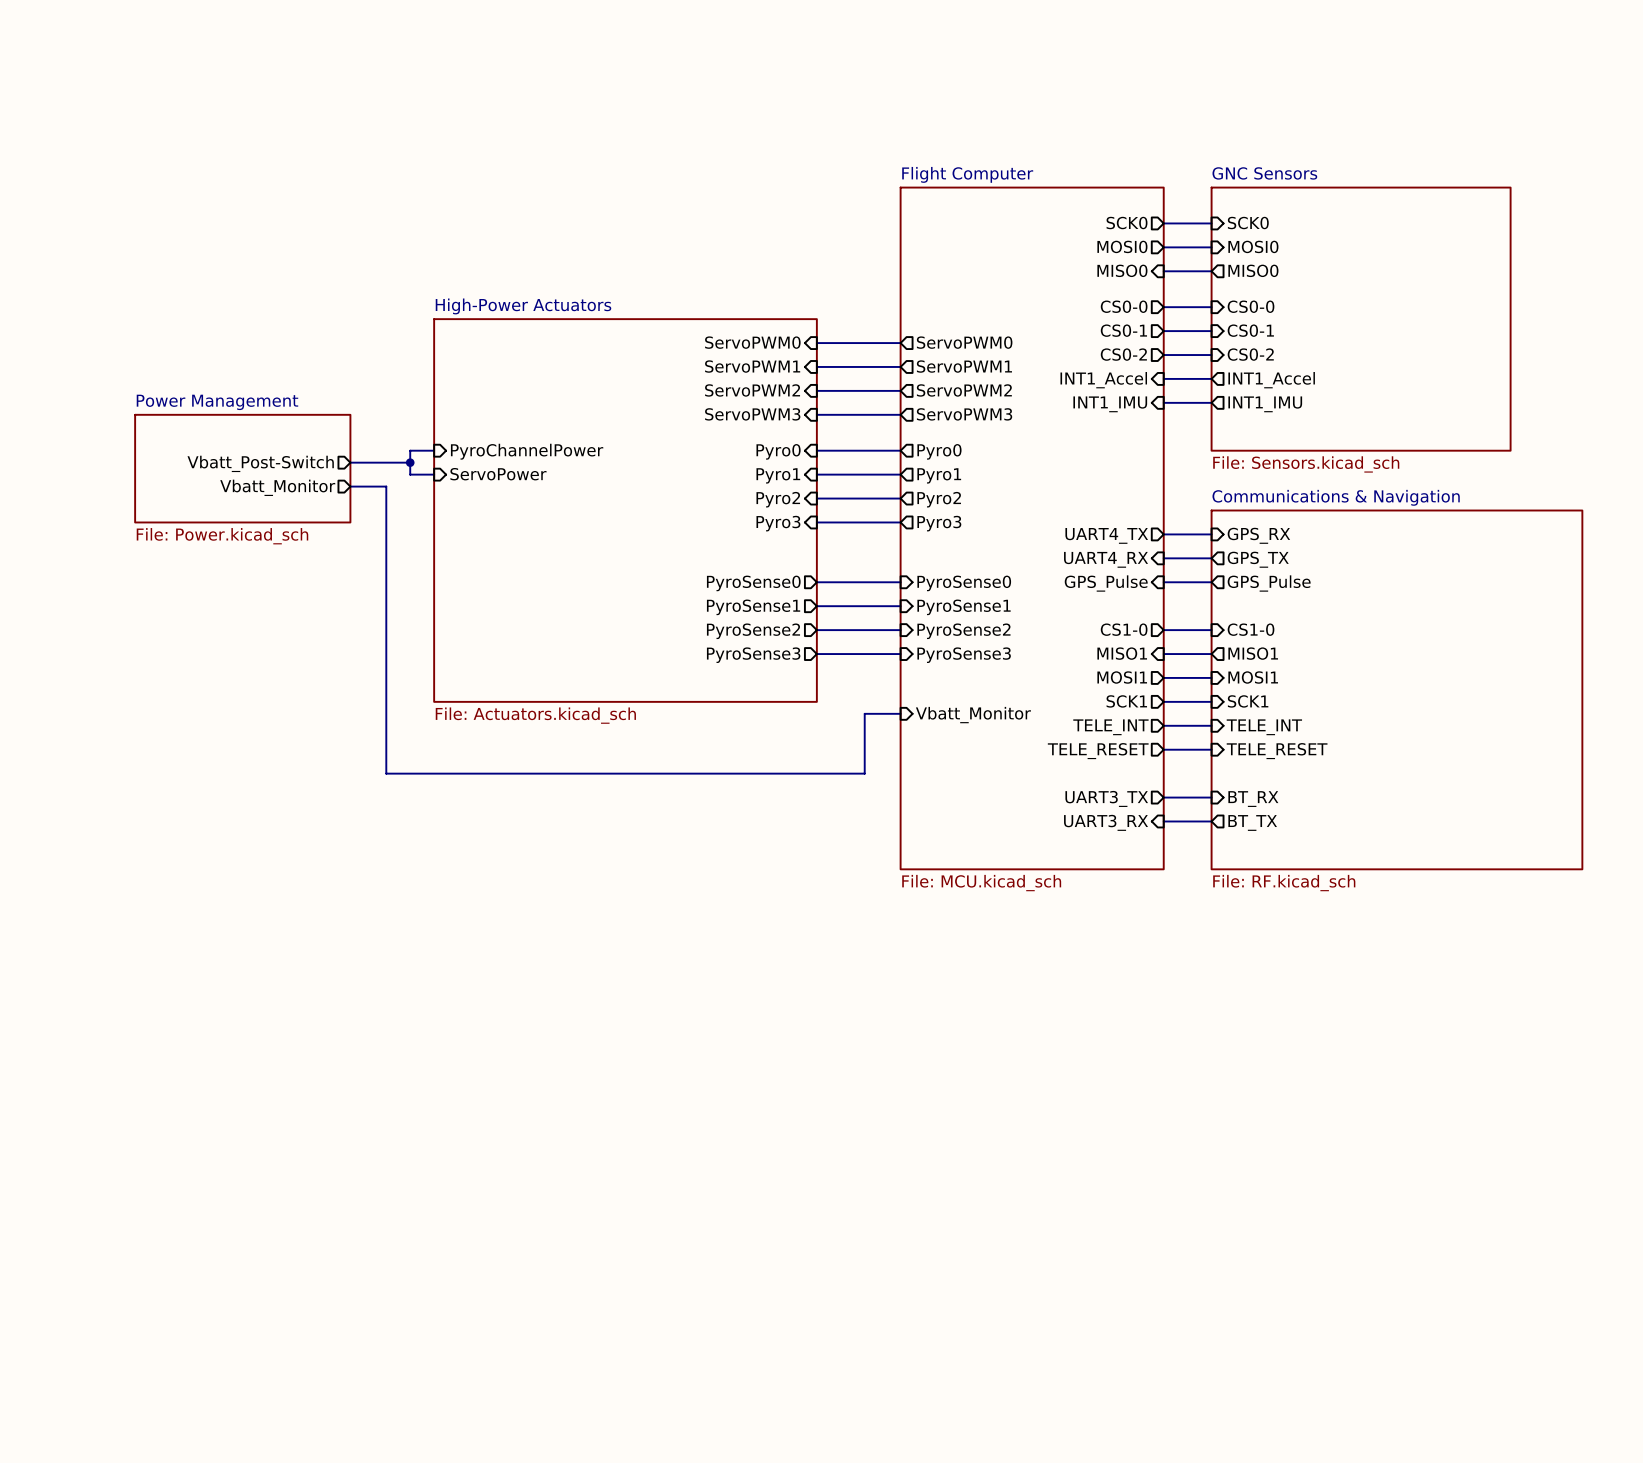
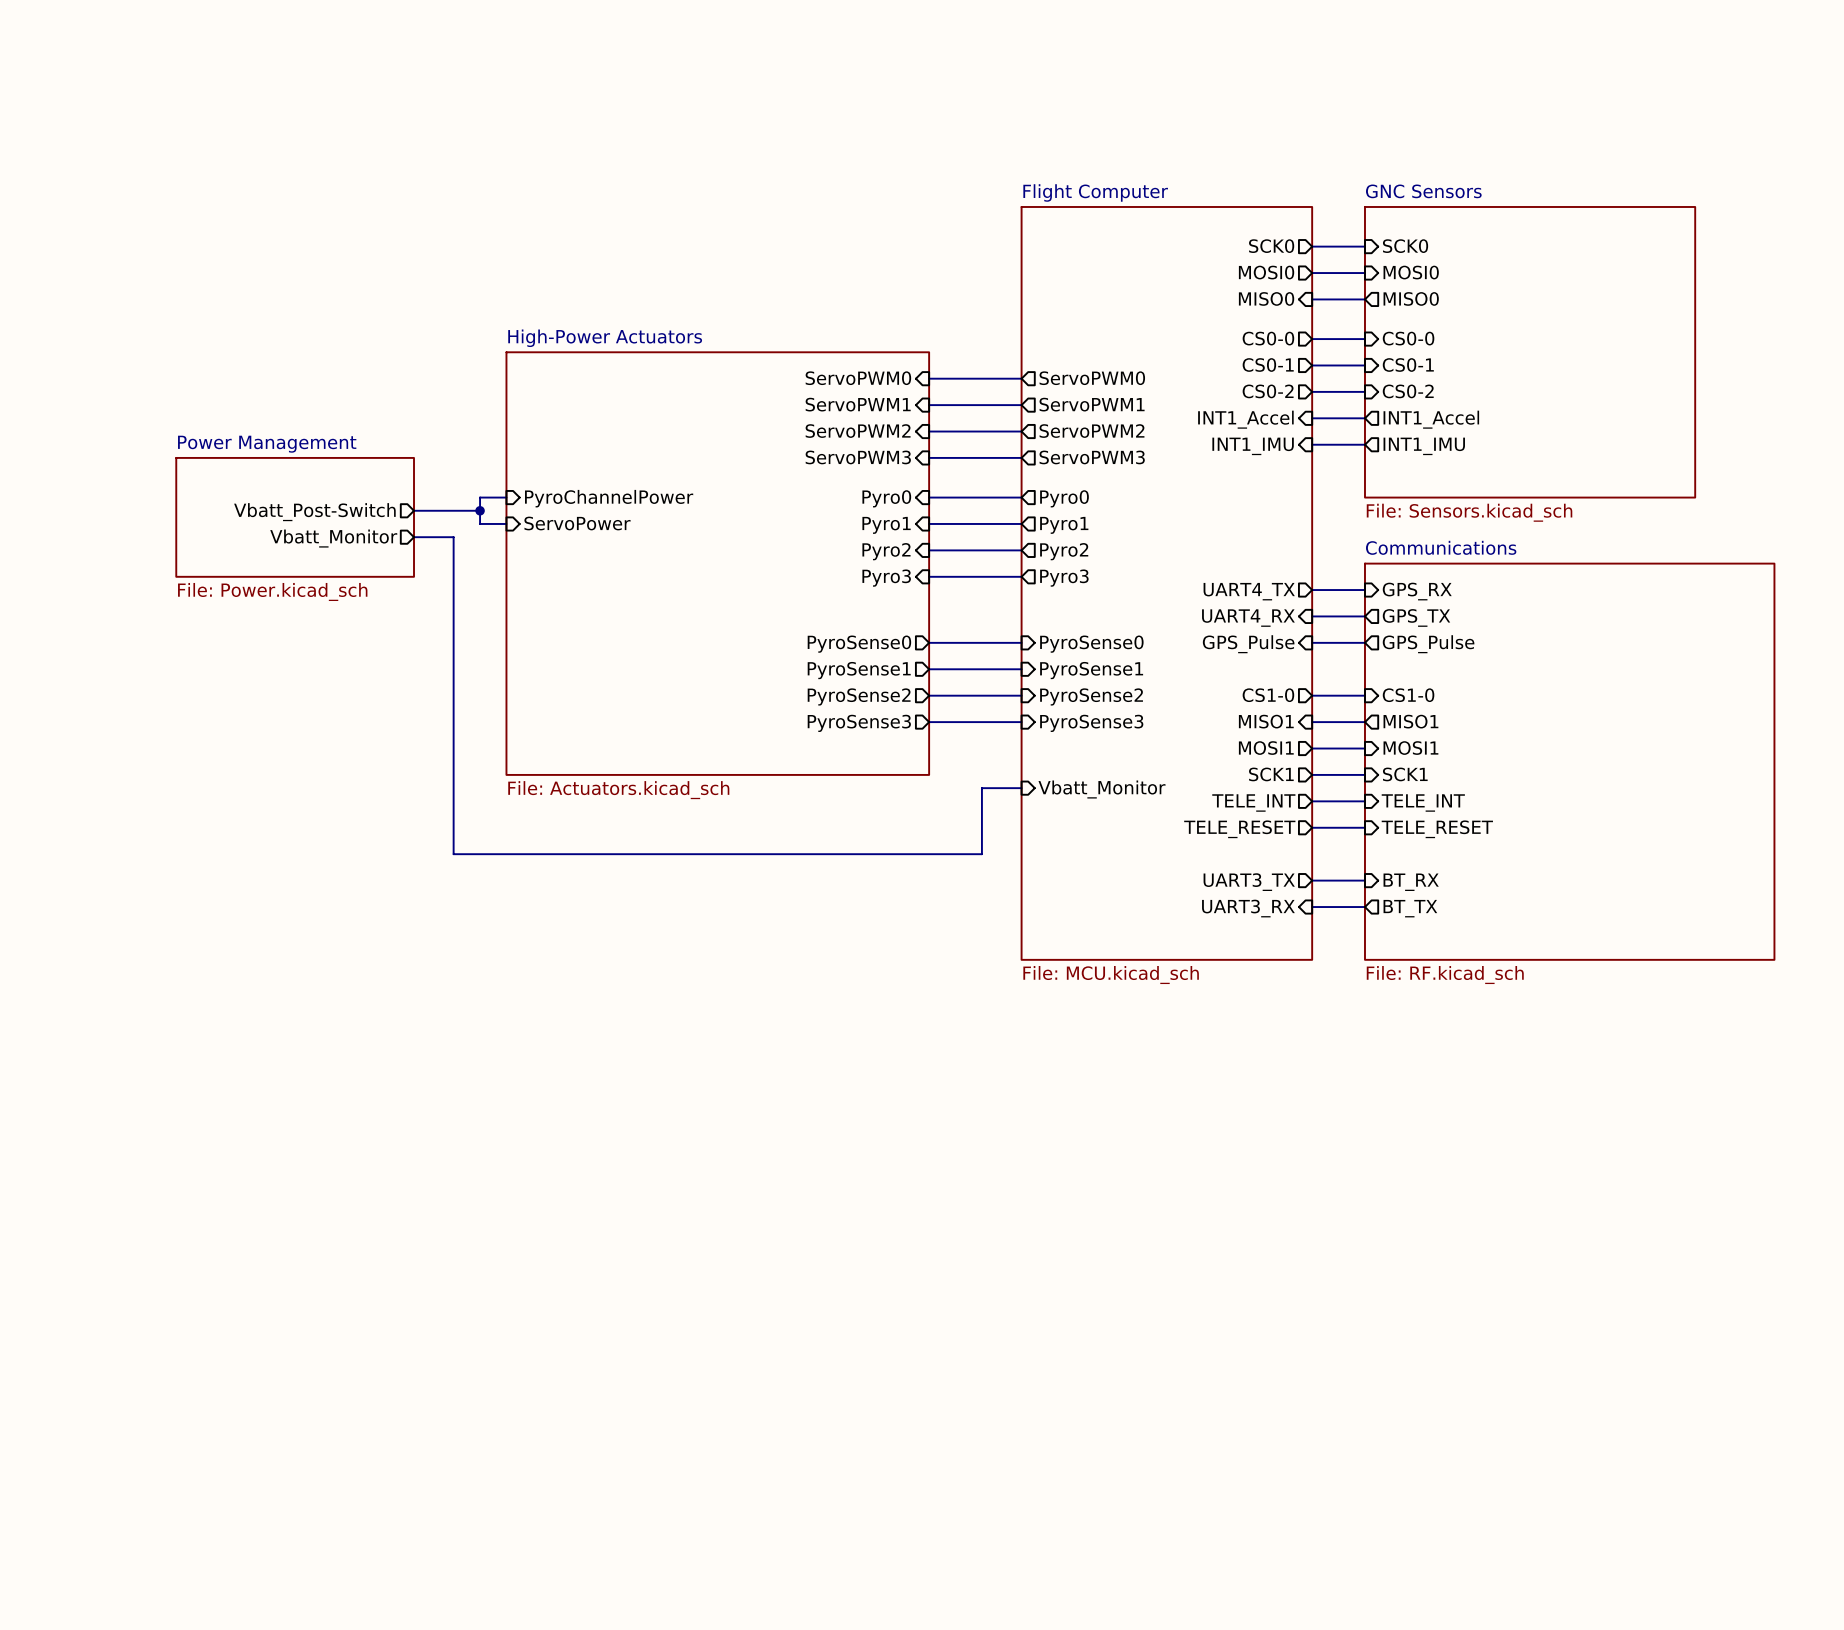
sheet Communications & Navigation name: Communications & Navigation (1336, 497) -> Communications (1441, 547)

